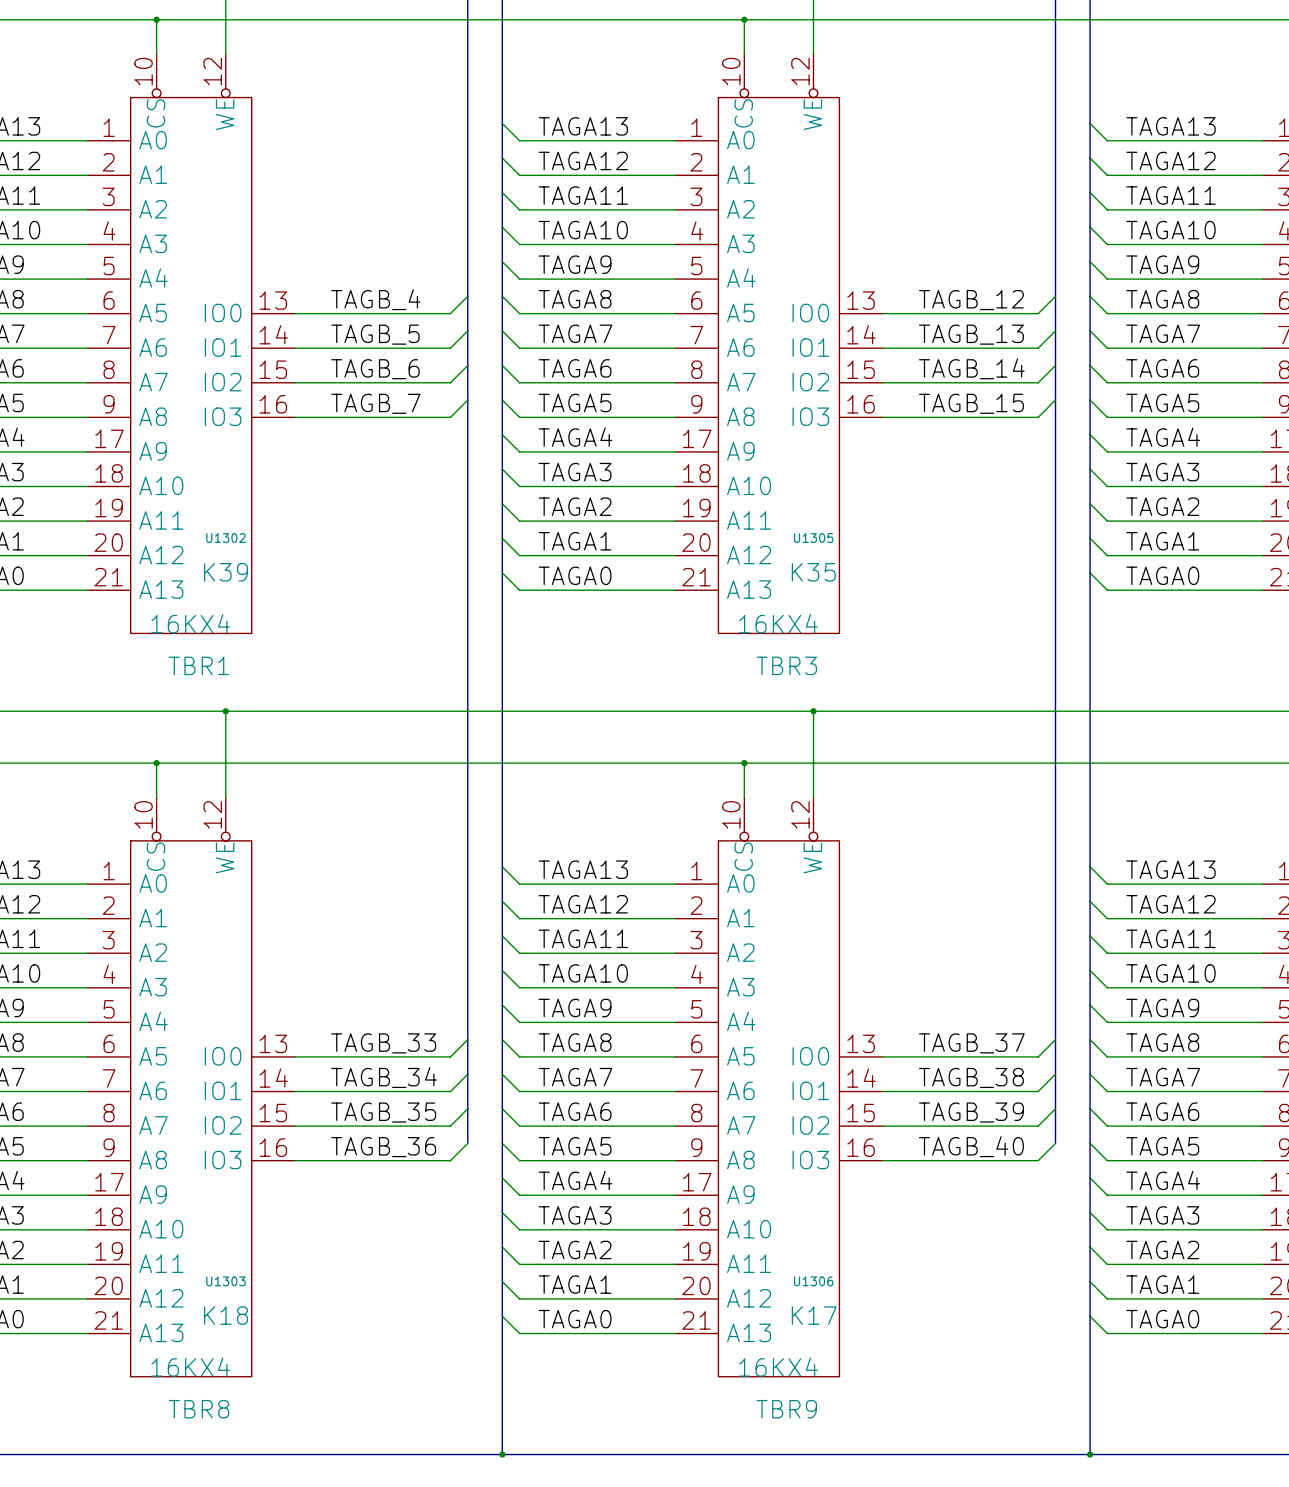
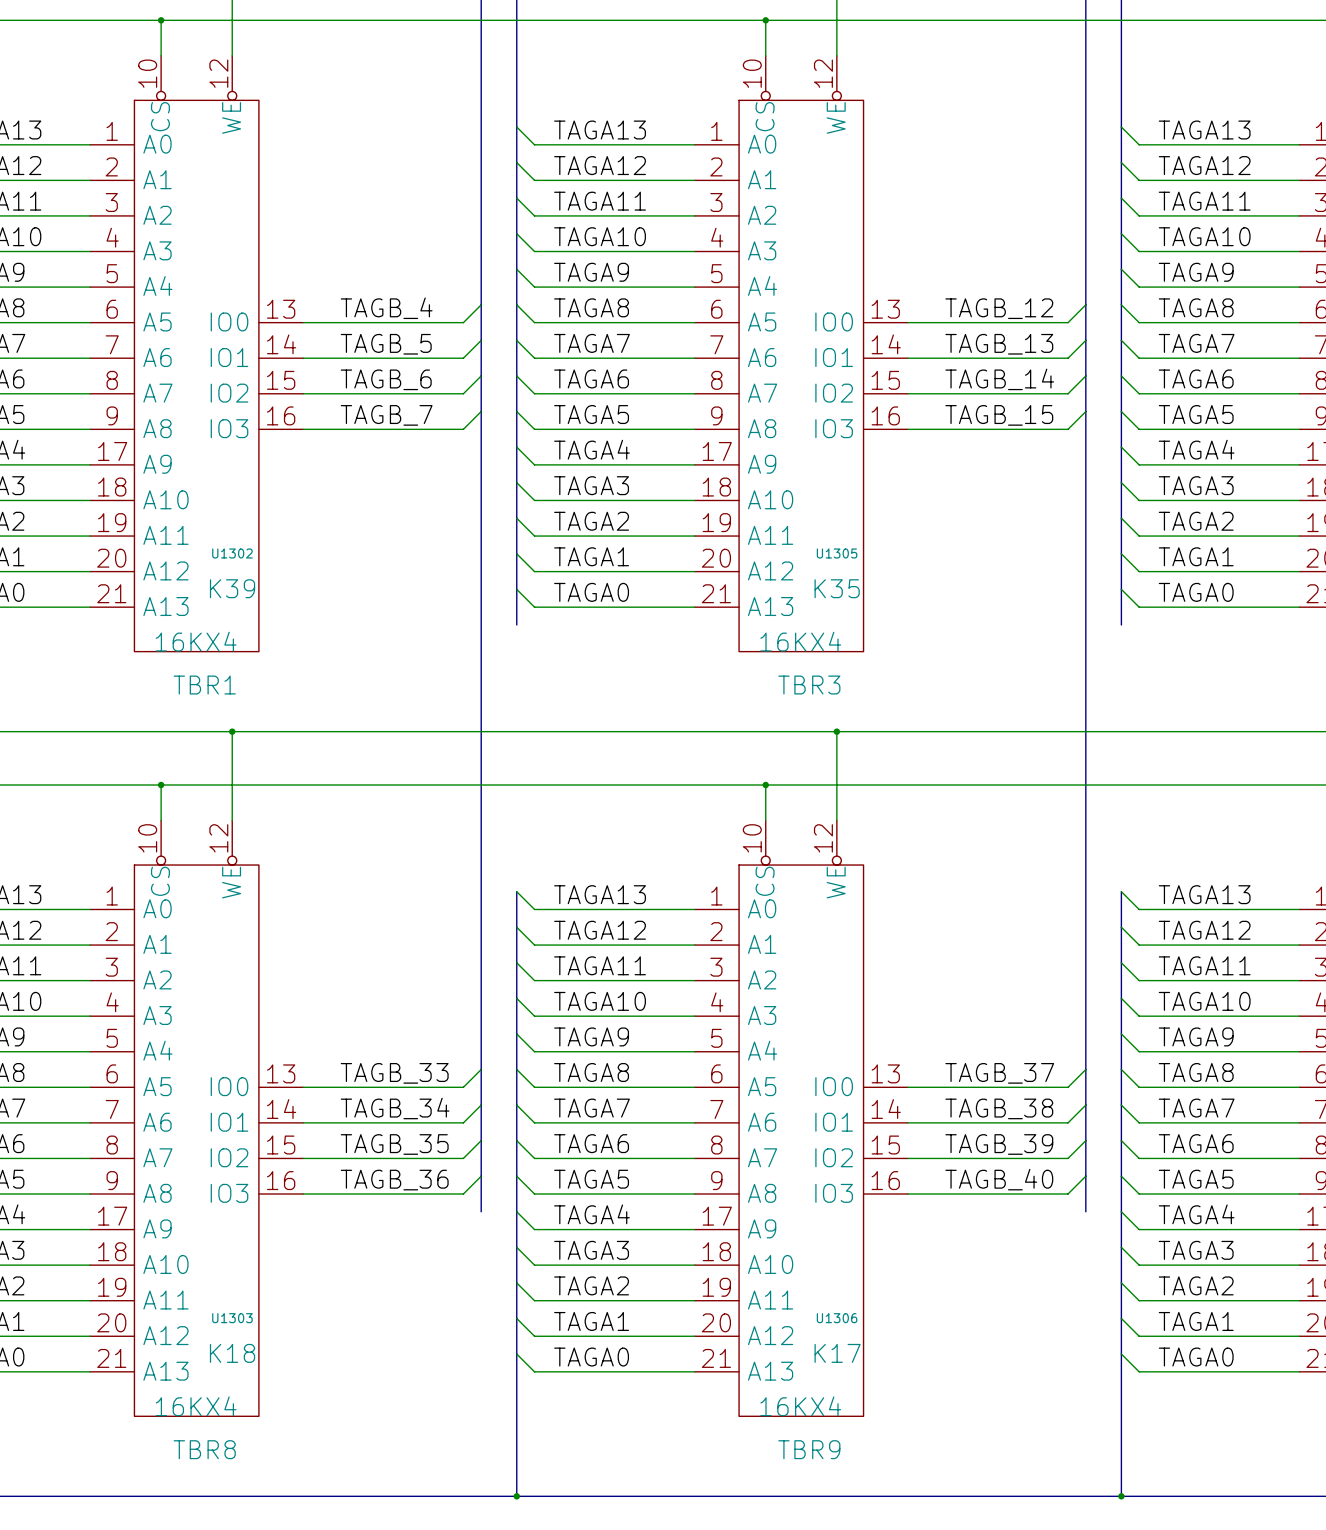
bus: (502, 607) (502, 866) -> none
bus: (1090, 607) (1090, 866) -> none
bus: none -> (481, 1176) (481, 1211)
bus: none -> (1085, 1176) (1085, 1211)

